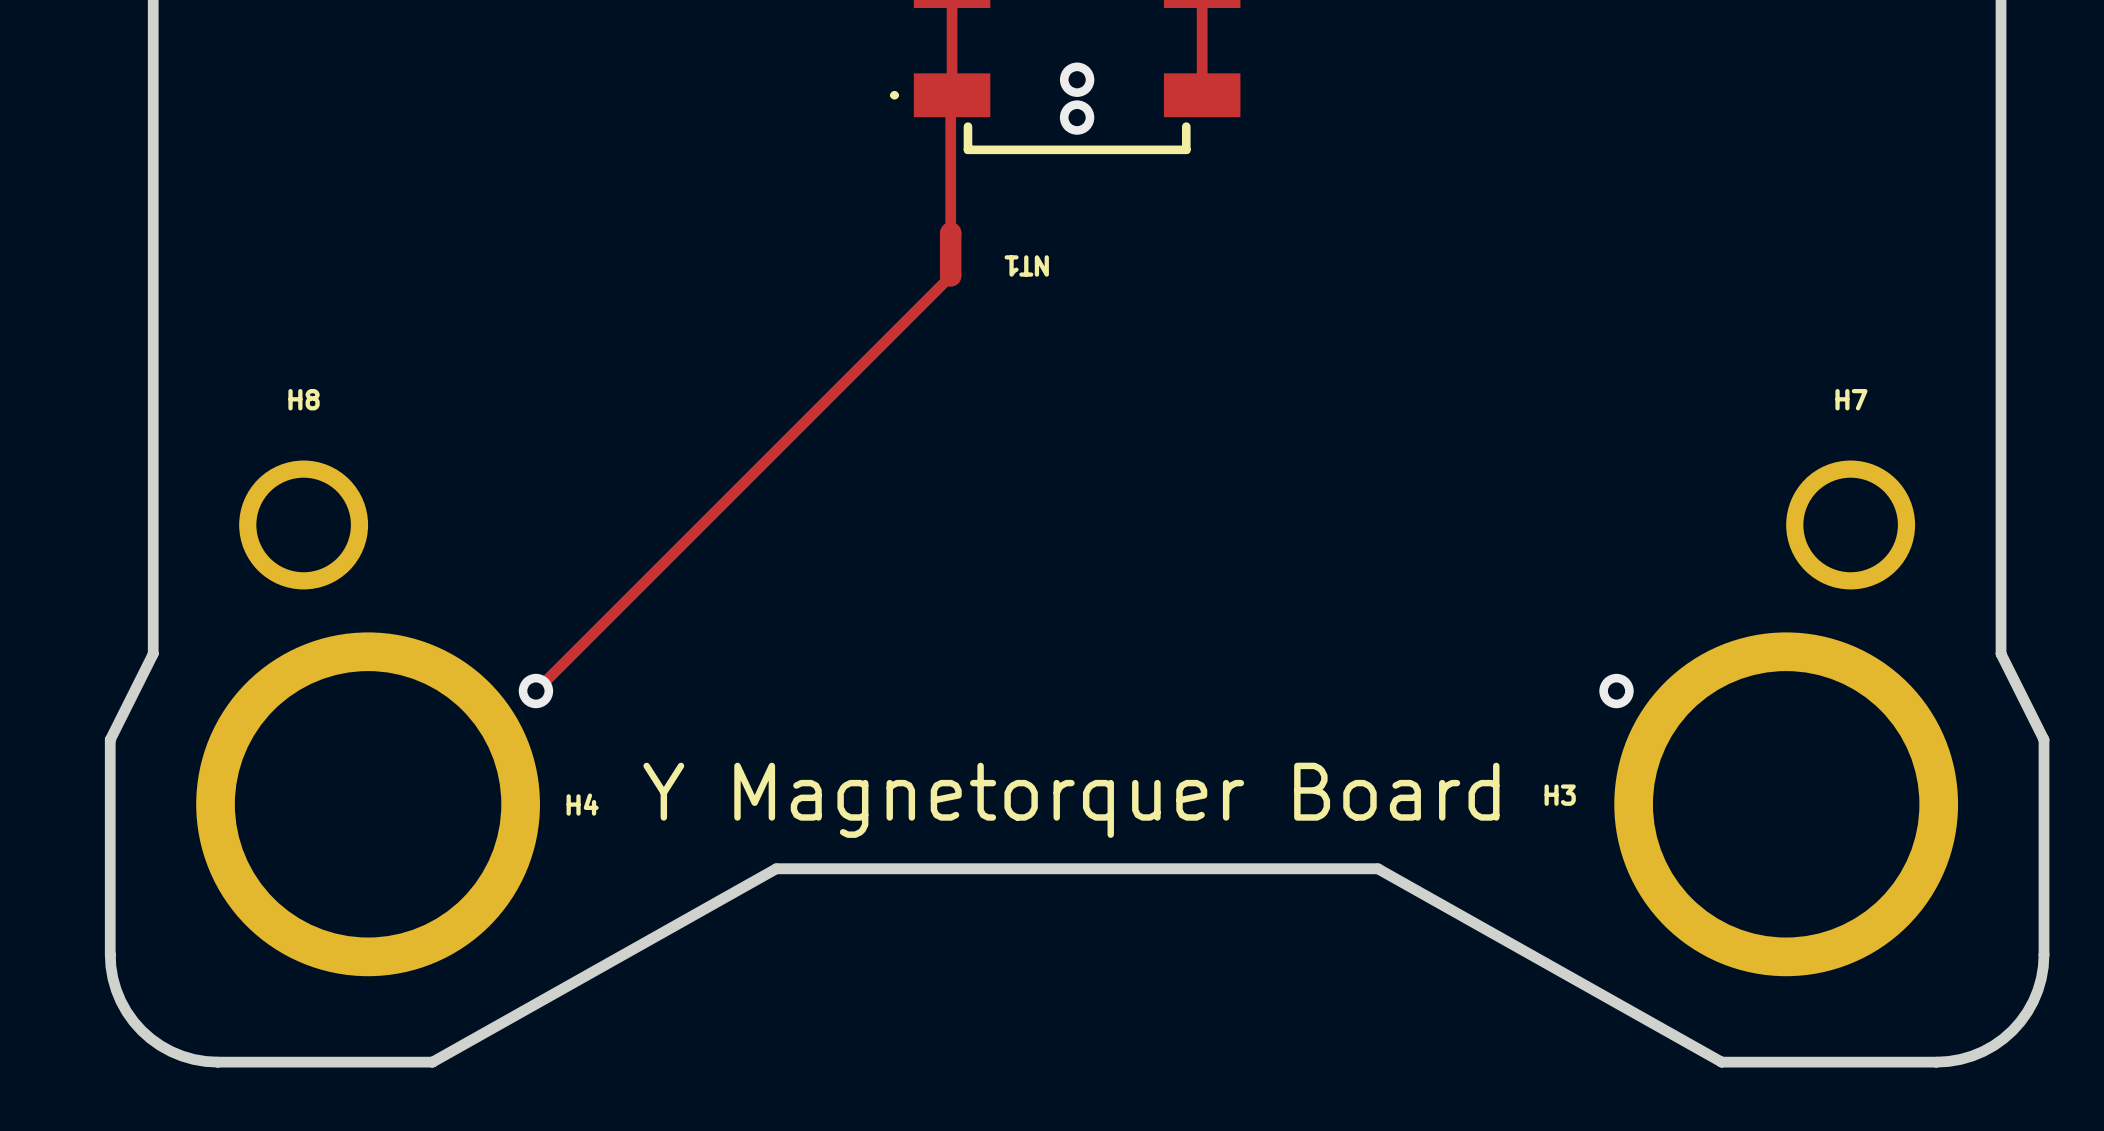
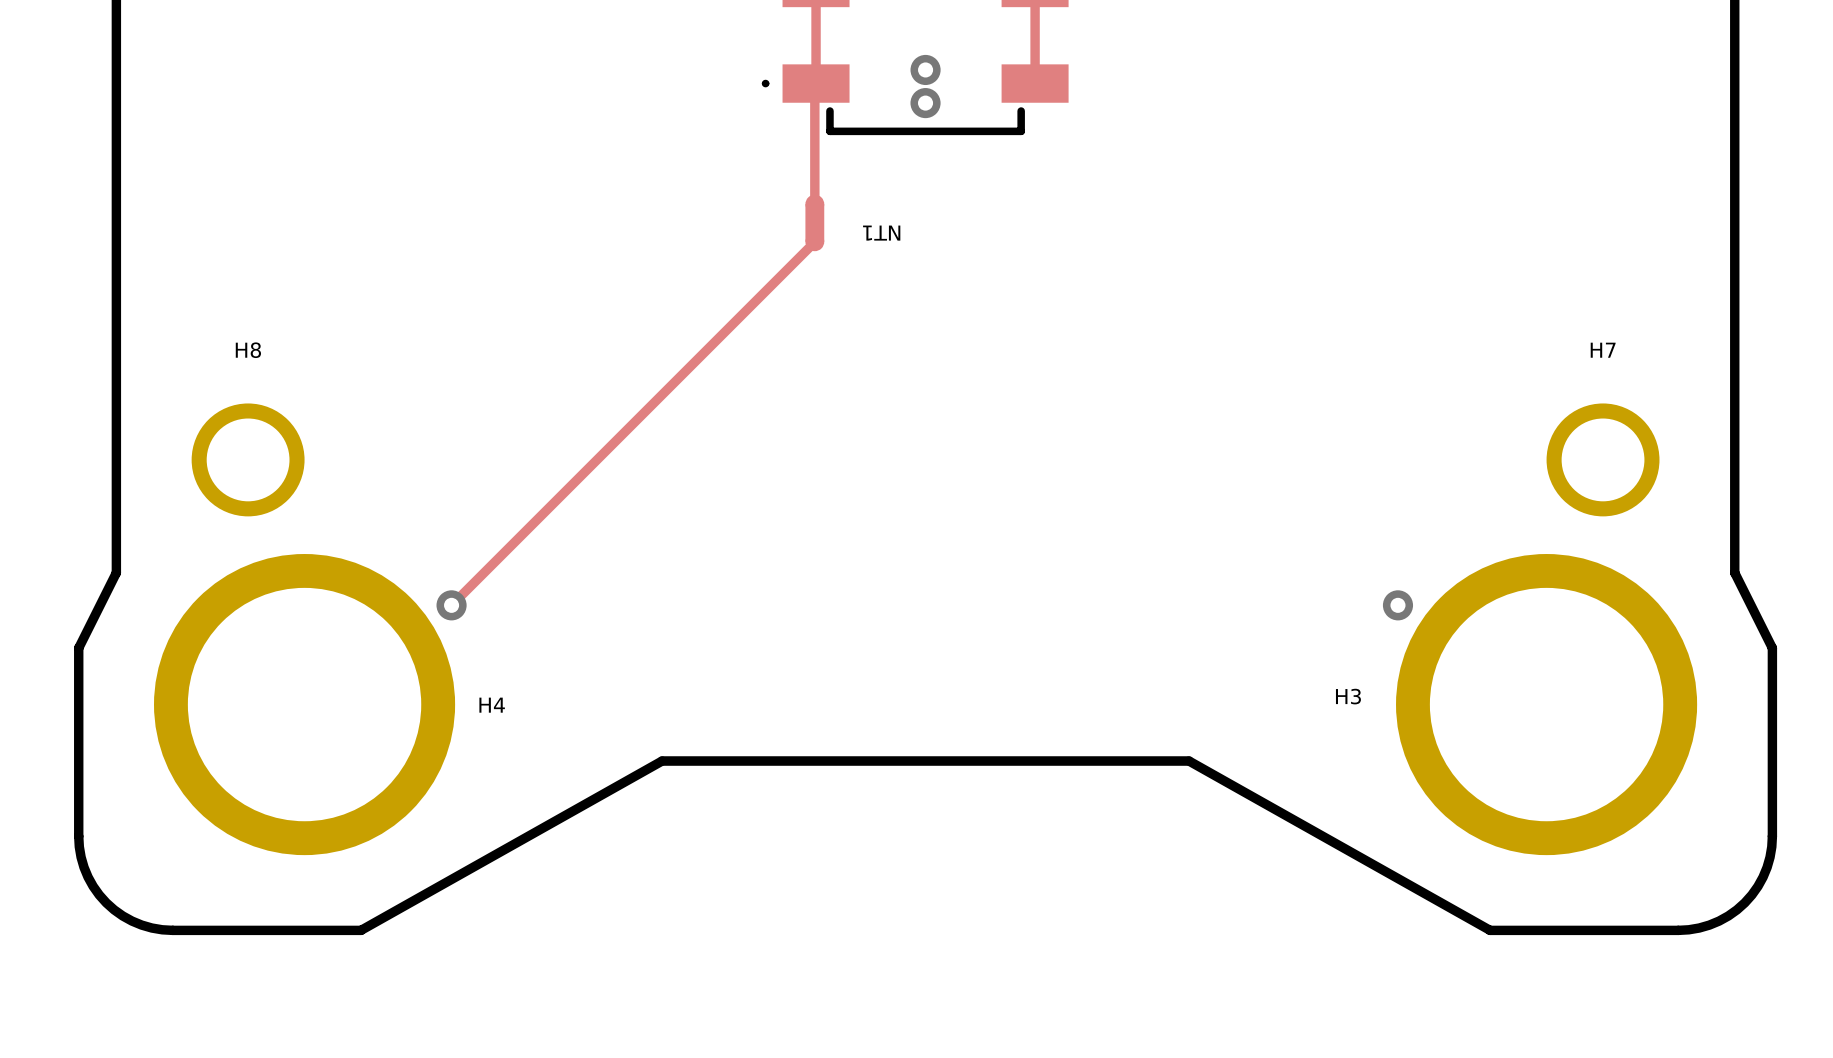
text: Y Magnetorquer Board (1071, 800) -> none

